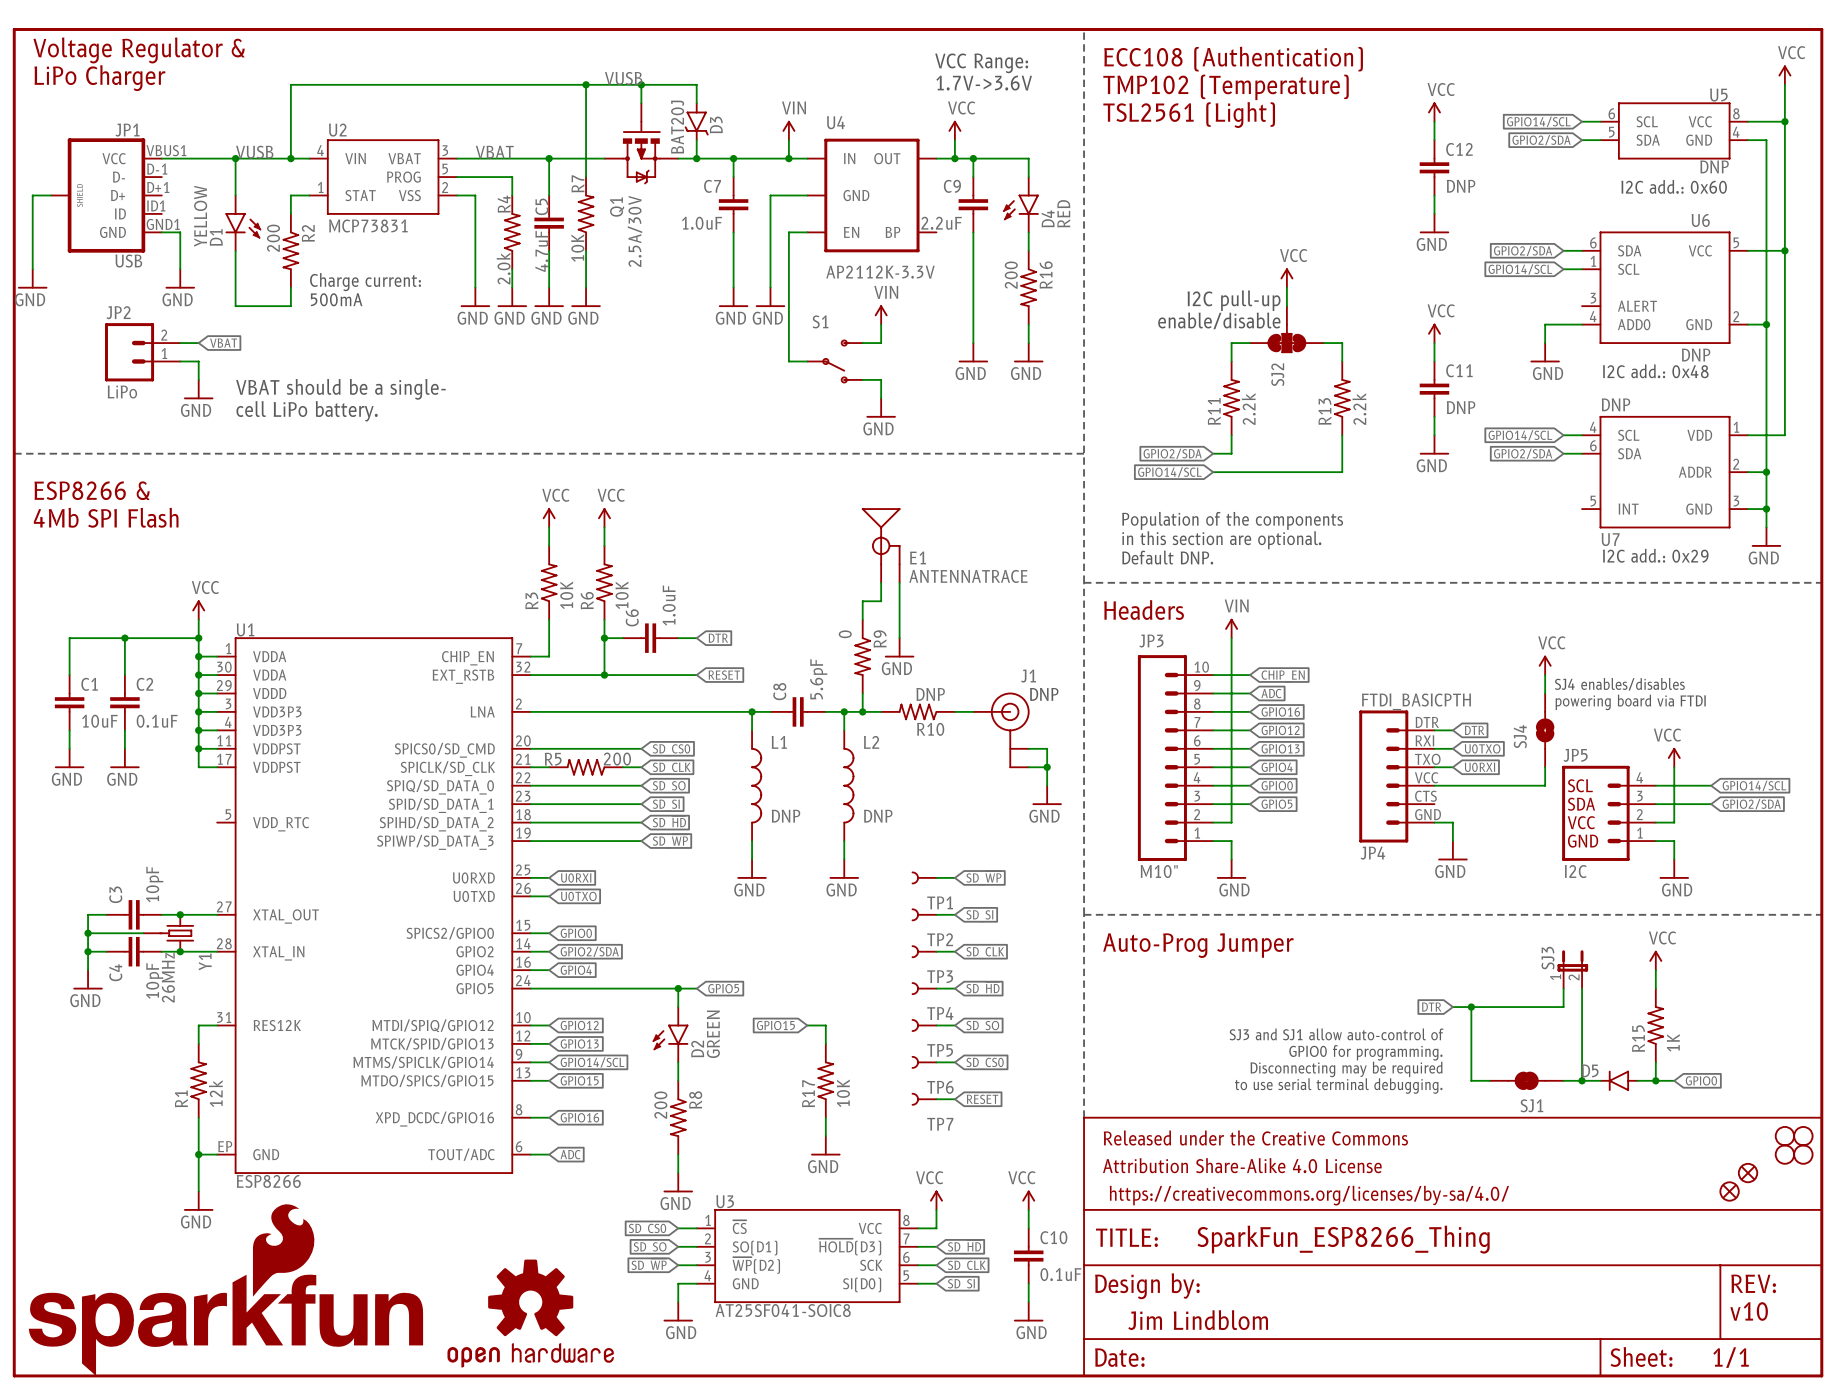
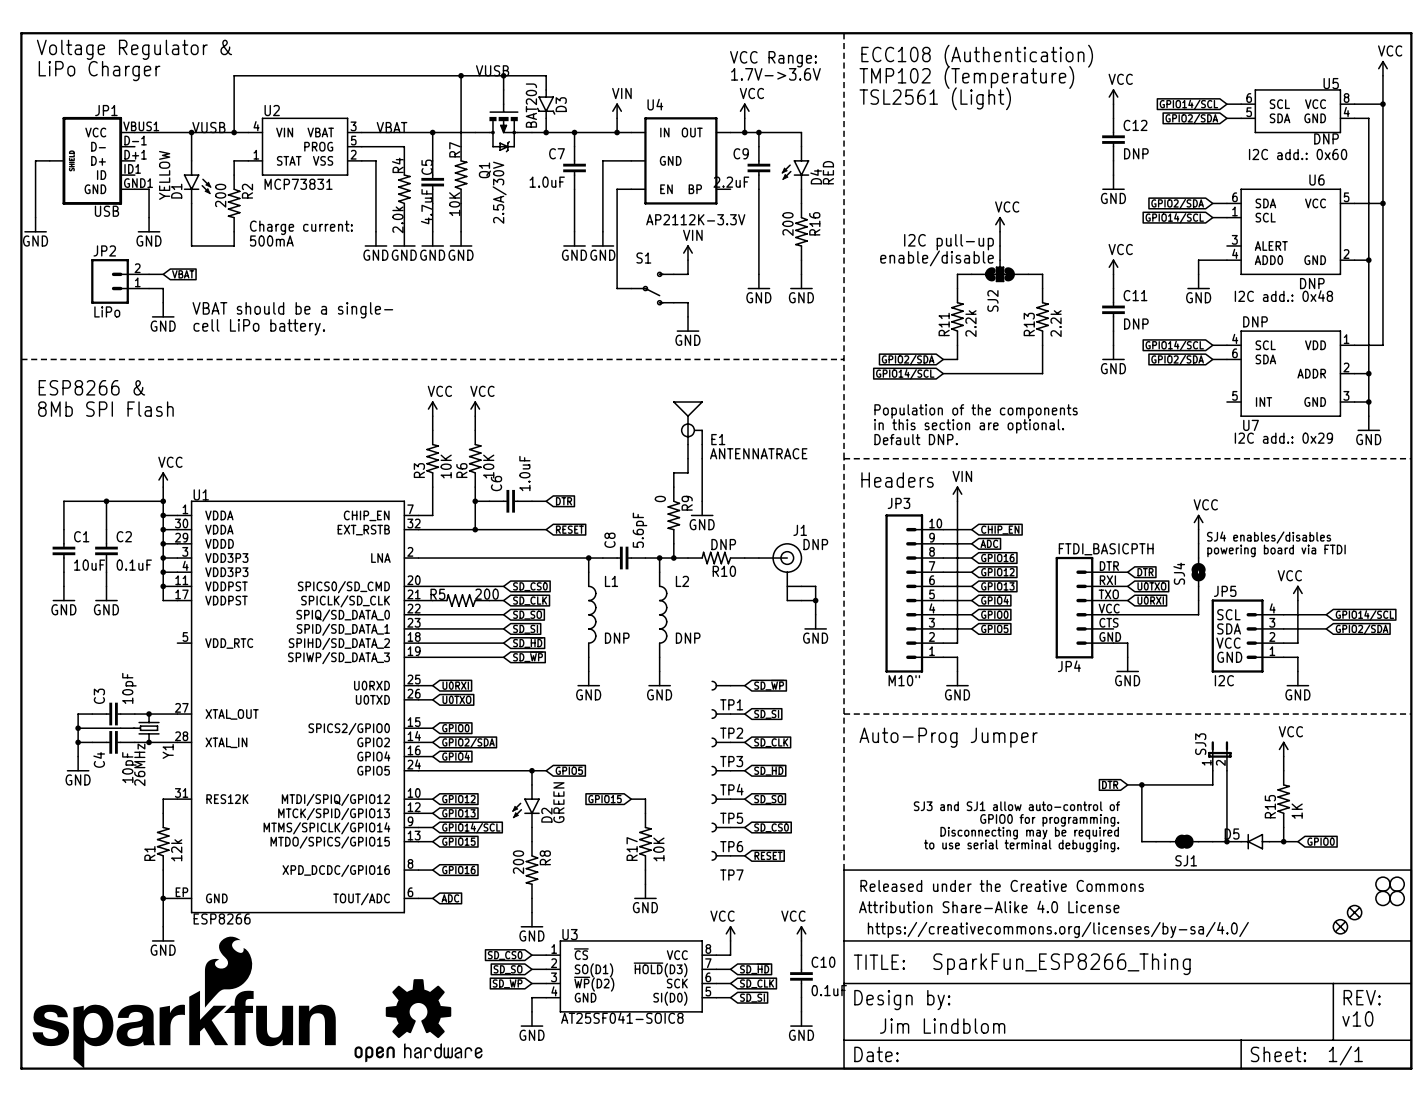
text: 4Mb SPI Flash (106, 517) -> 8Mb SPI Flash (105, 409)

